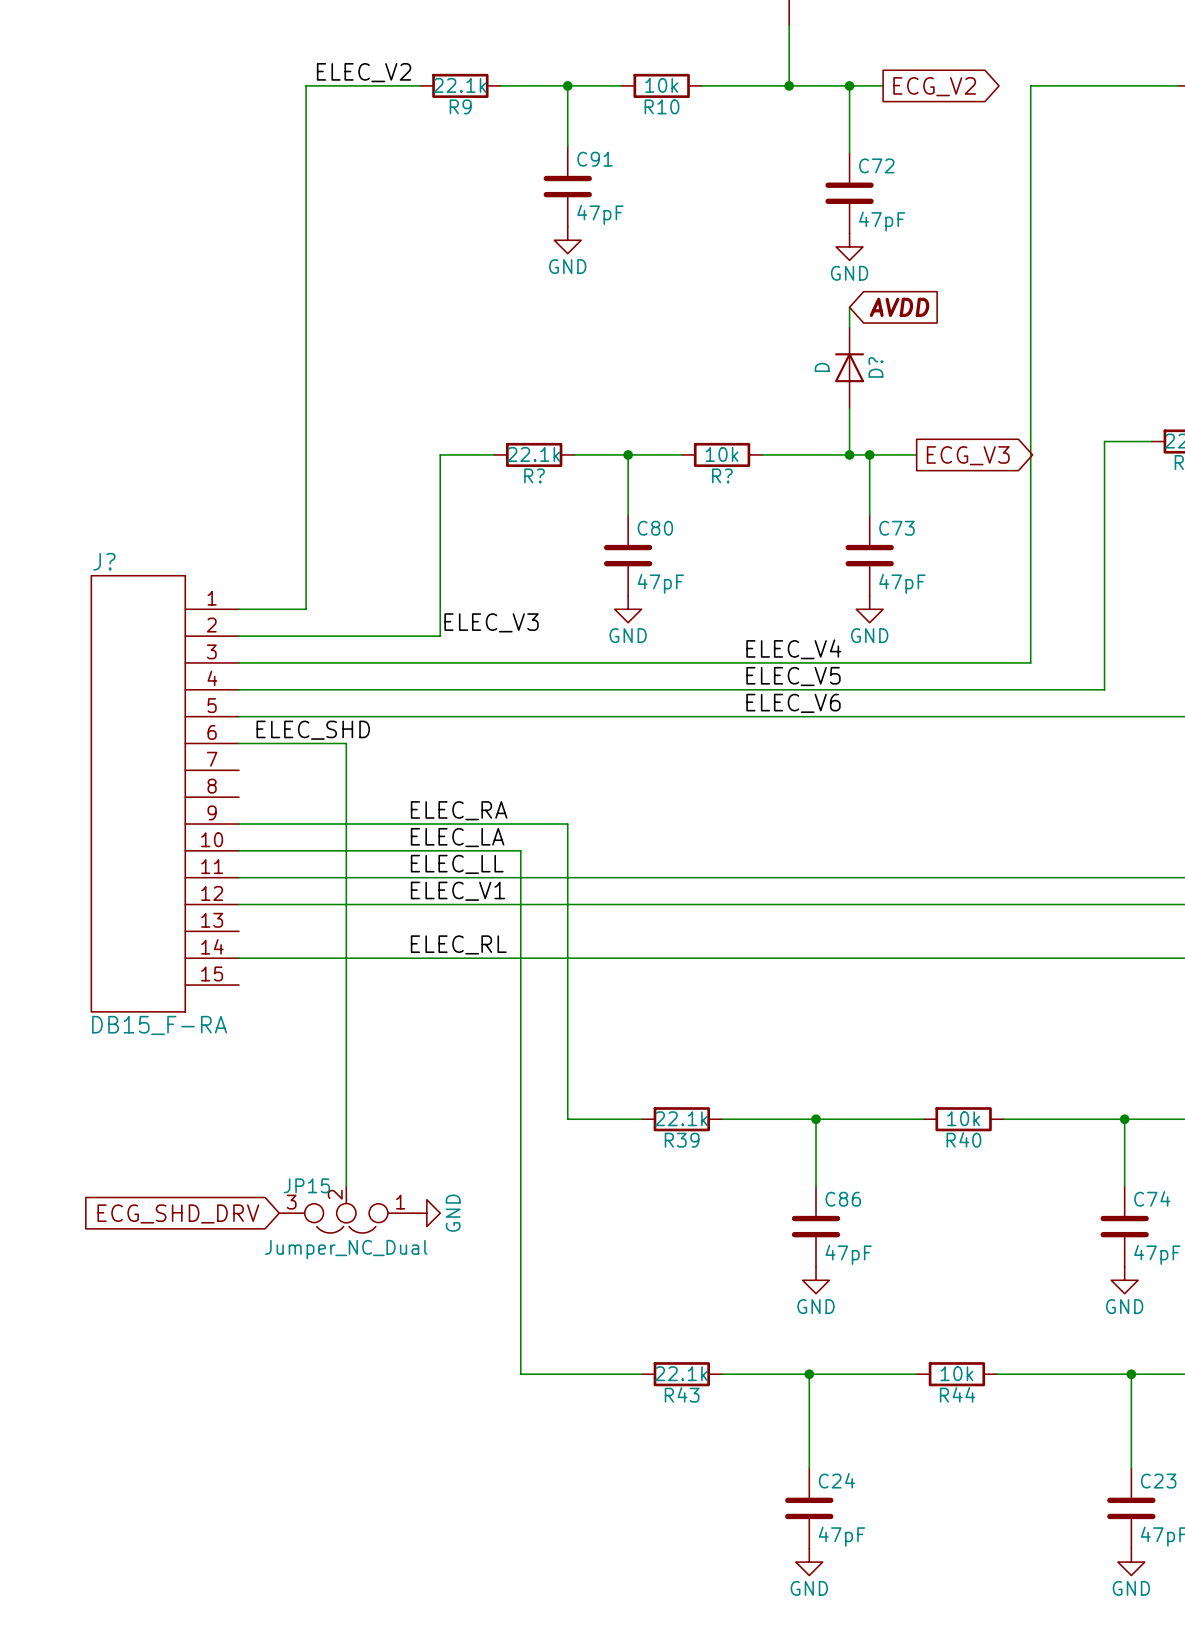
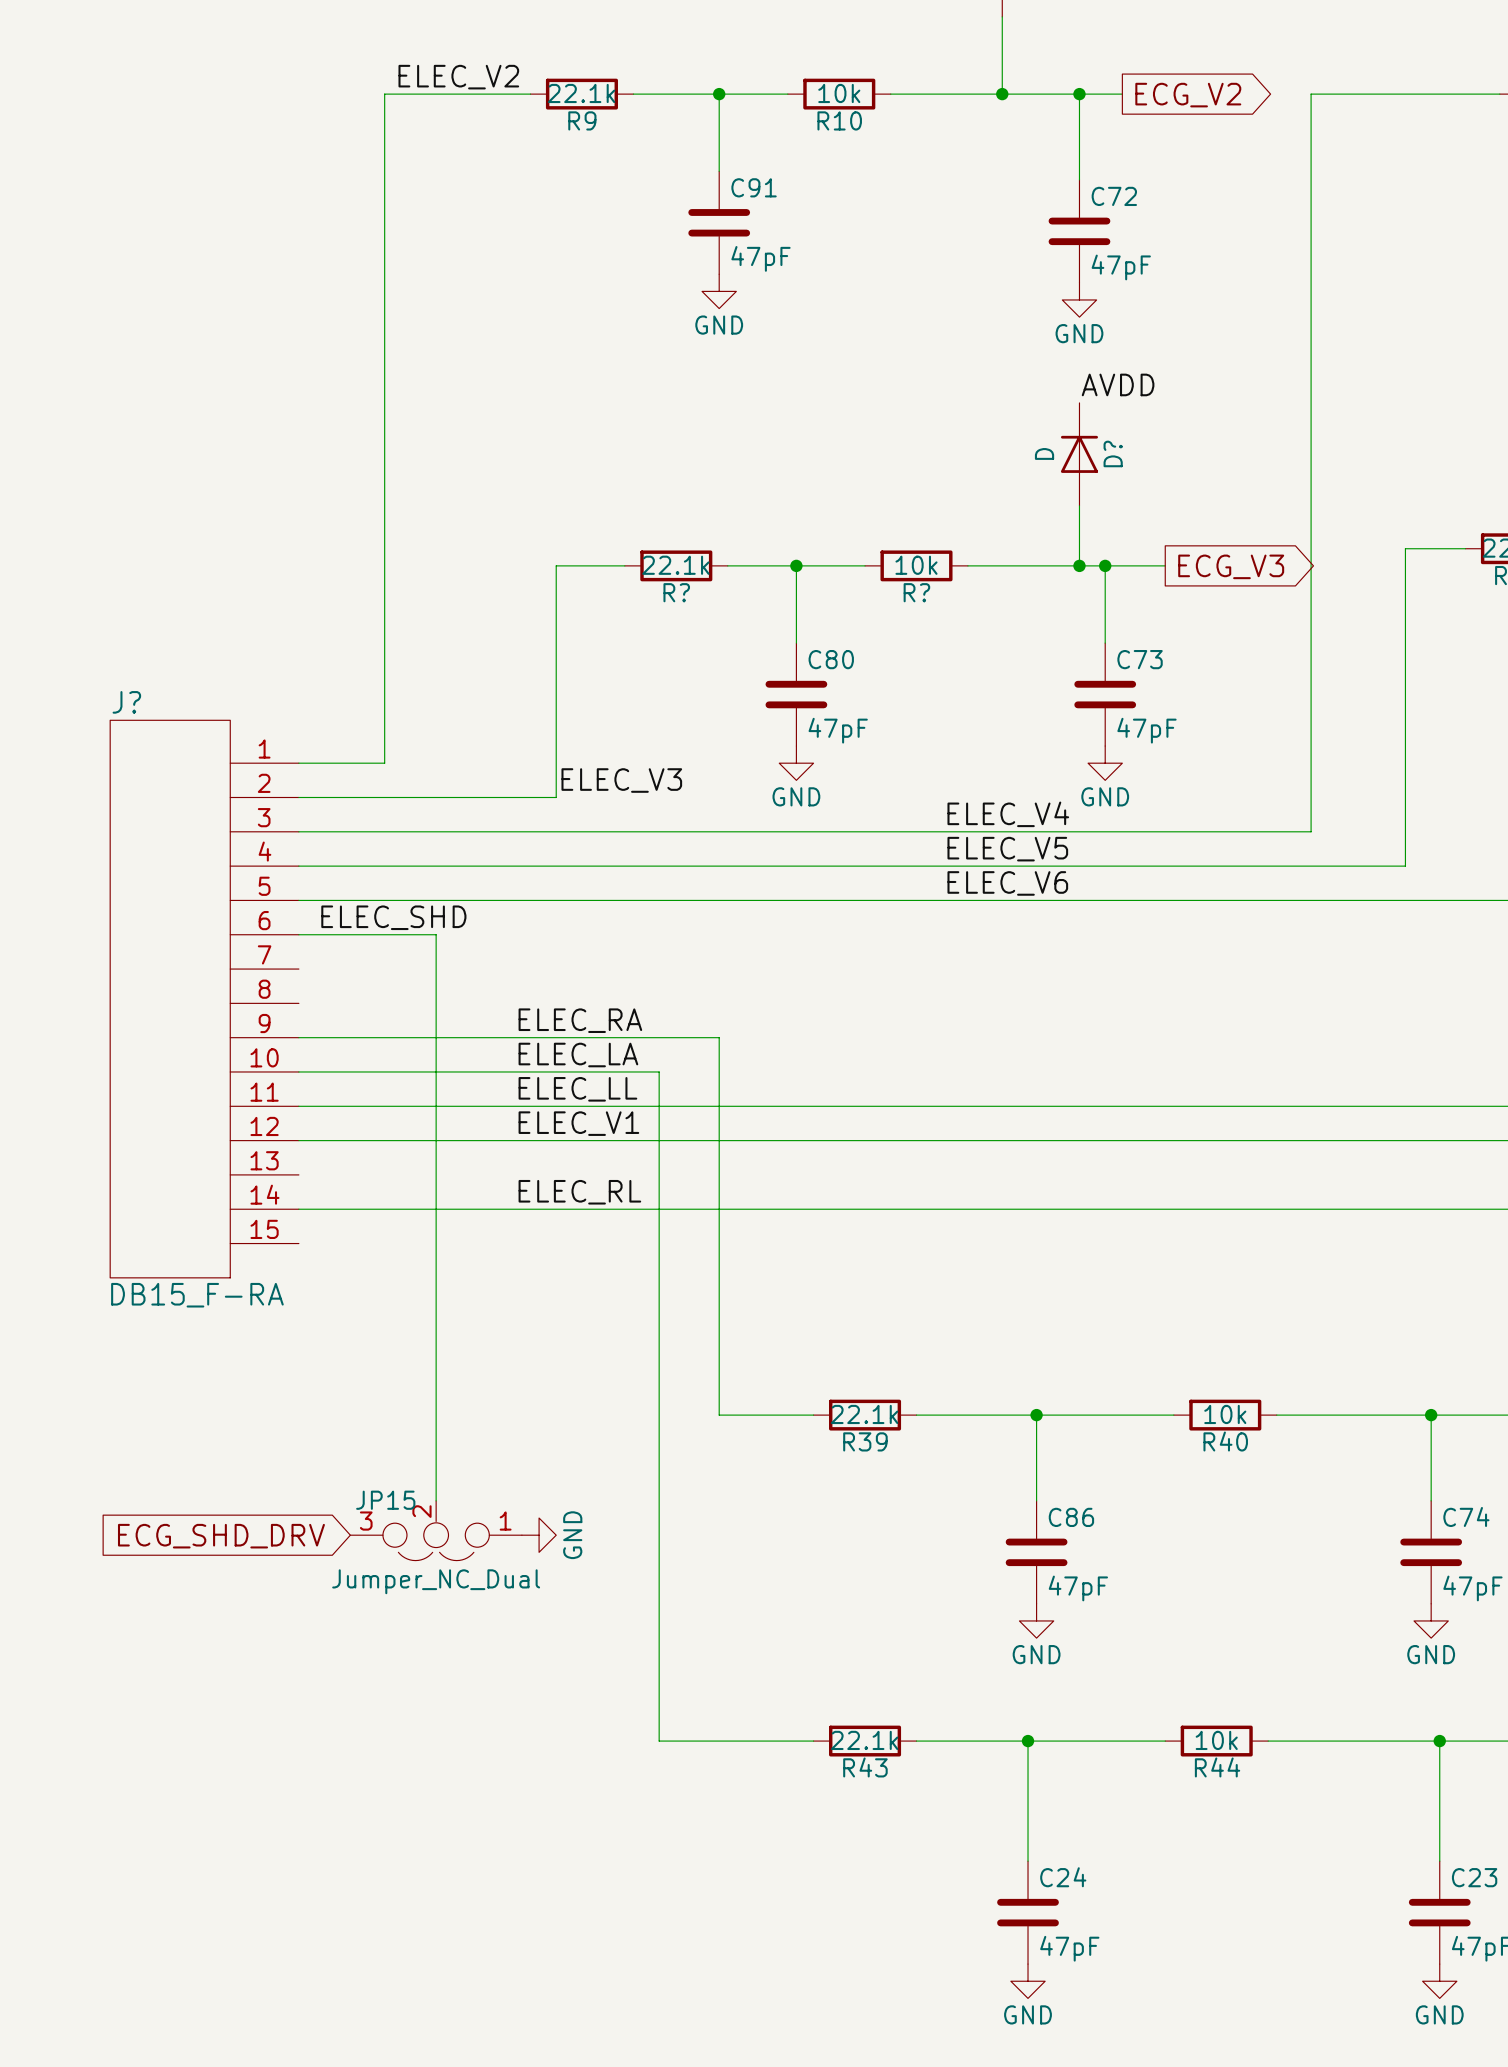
wire: (849, 307) (849, 327) -> none
global label: AVDD (899, 307) -> none
label: none -> AVDD (1118, 384)

